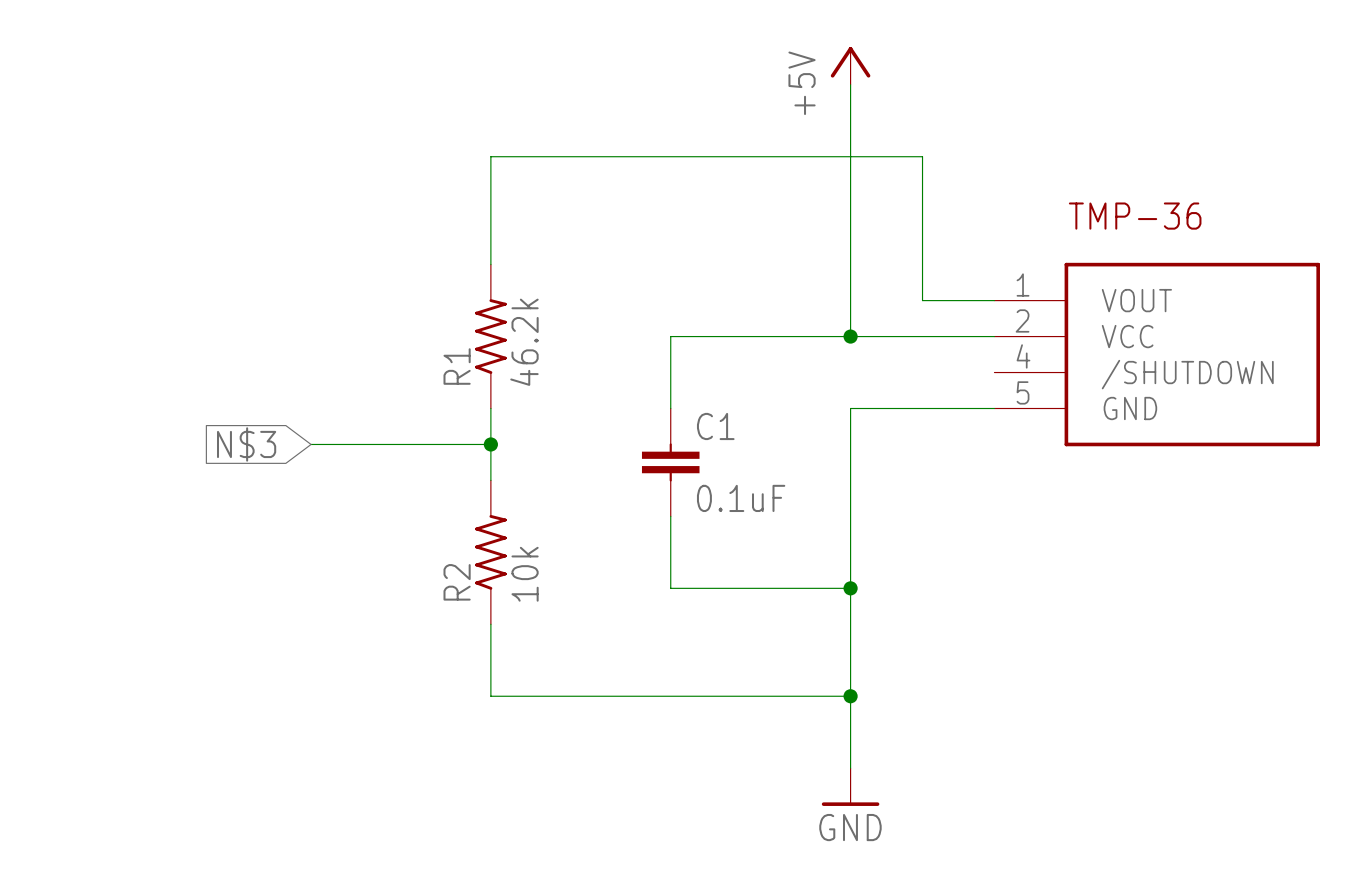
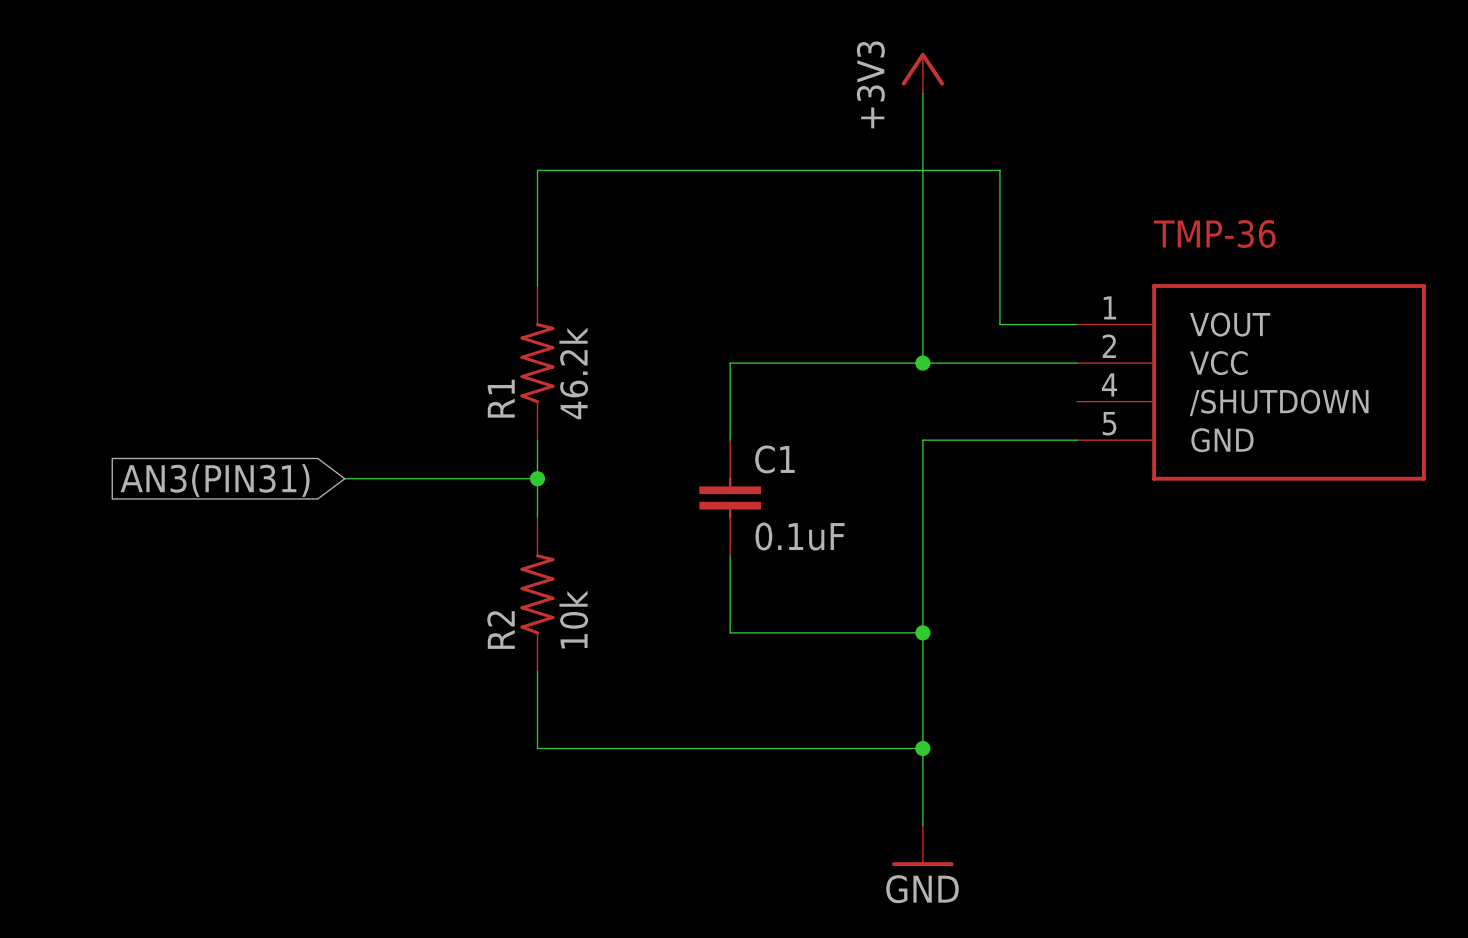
power symbol: +5V (850, 65) -> +3V3 (922, 73)
global label: N$3 (246, 444) -> AN3(PIN31) (215, 480)

